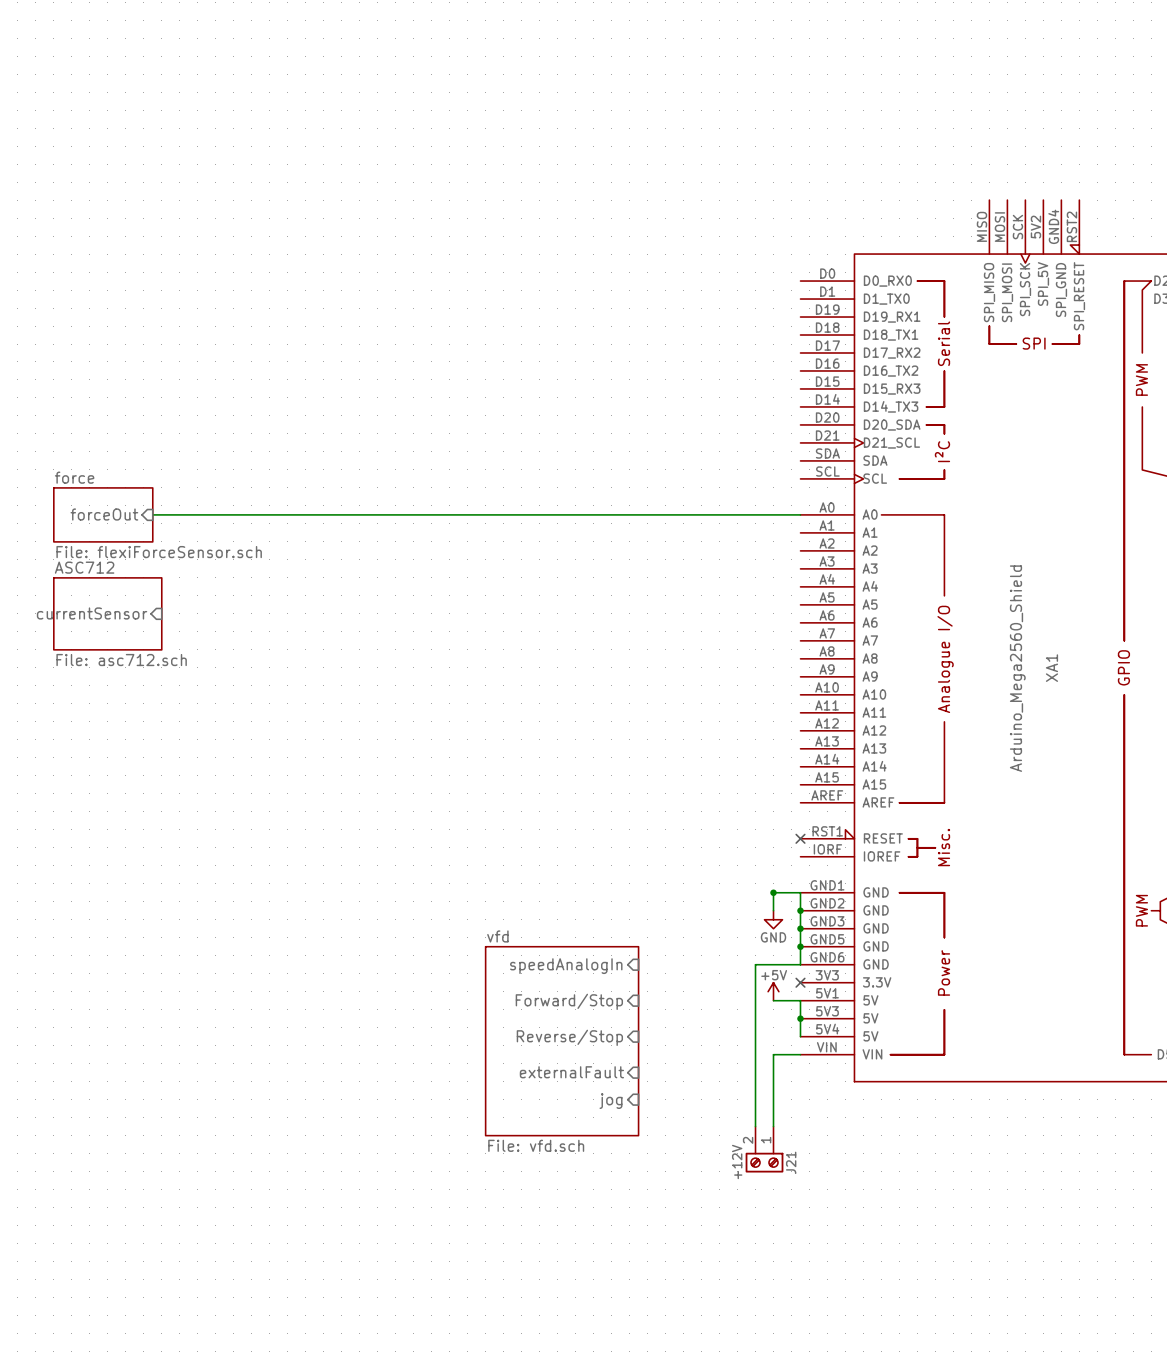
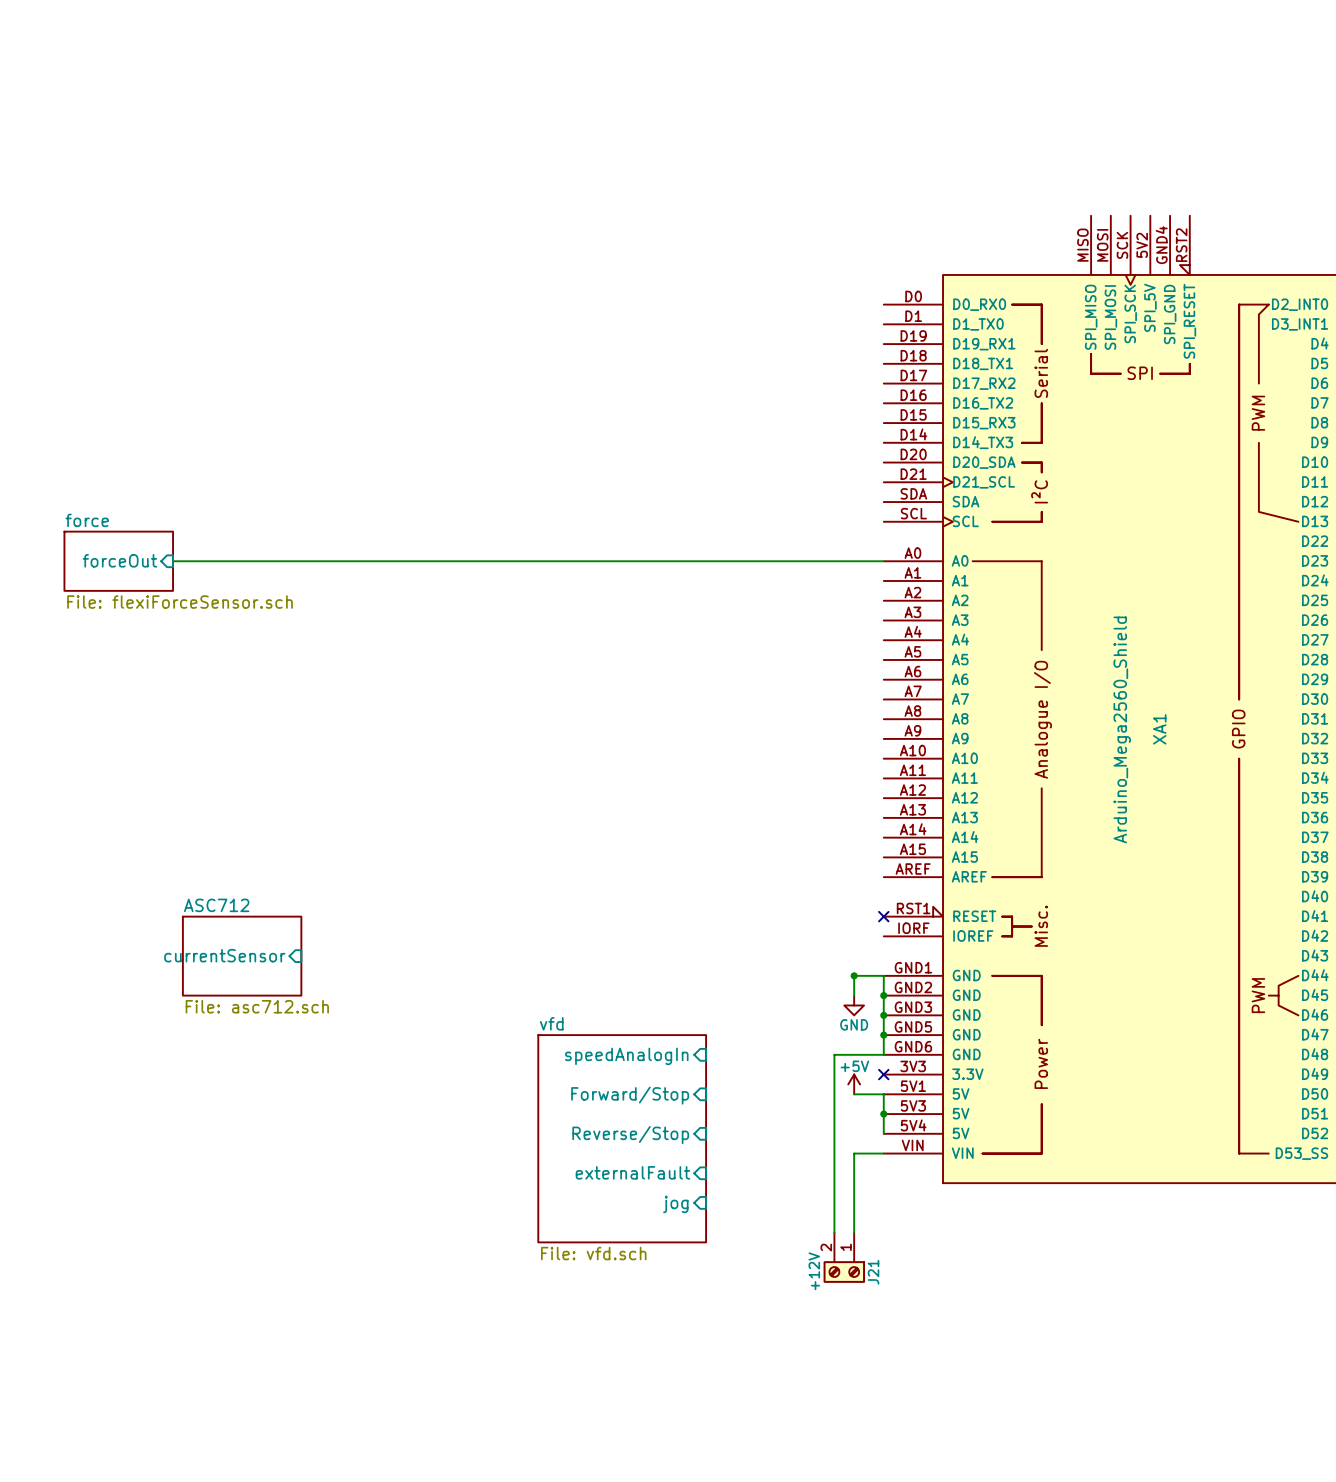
sheet pin: currentSensor (92, 613) -> none
sheet ASC712 position: (107, 613) -> (242, 956)
sheet pin: none -> currentSensor (224, 955)

